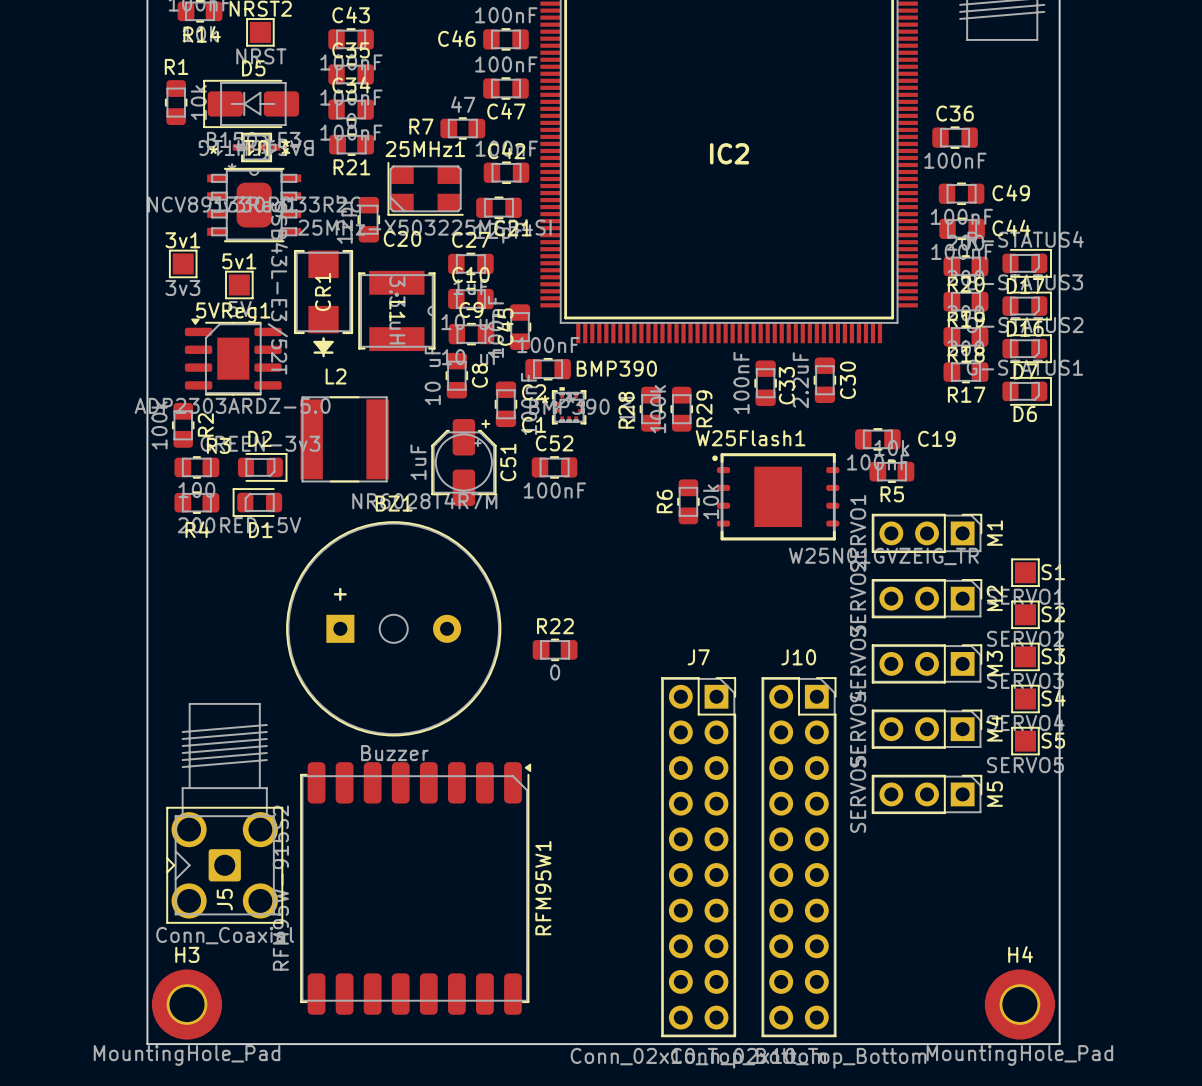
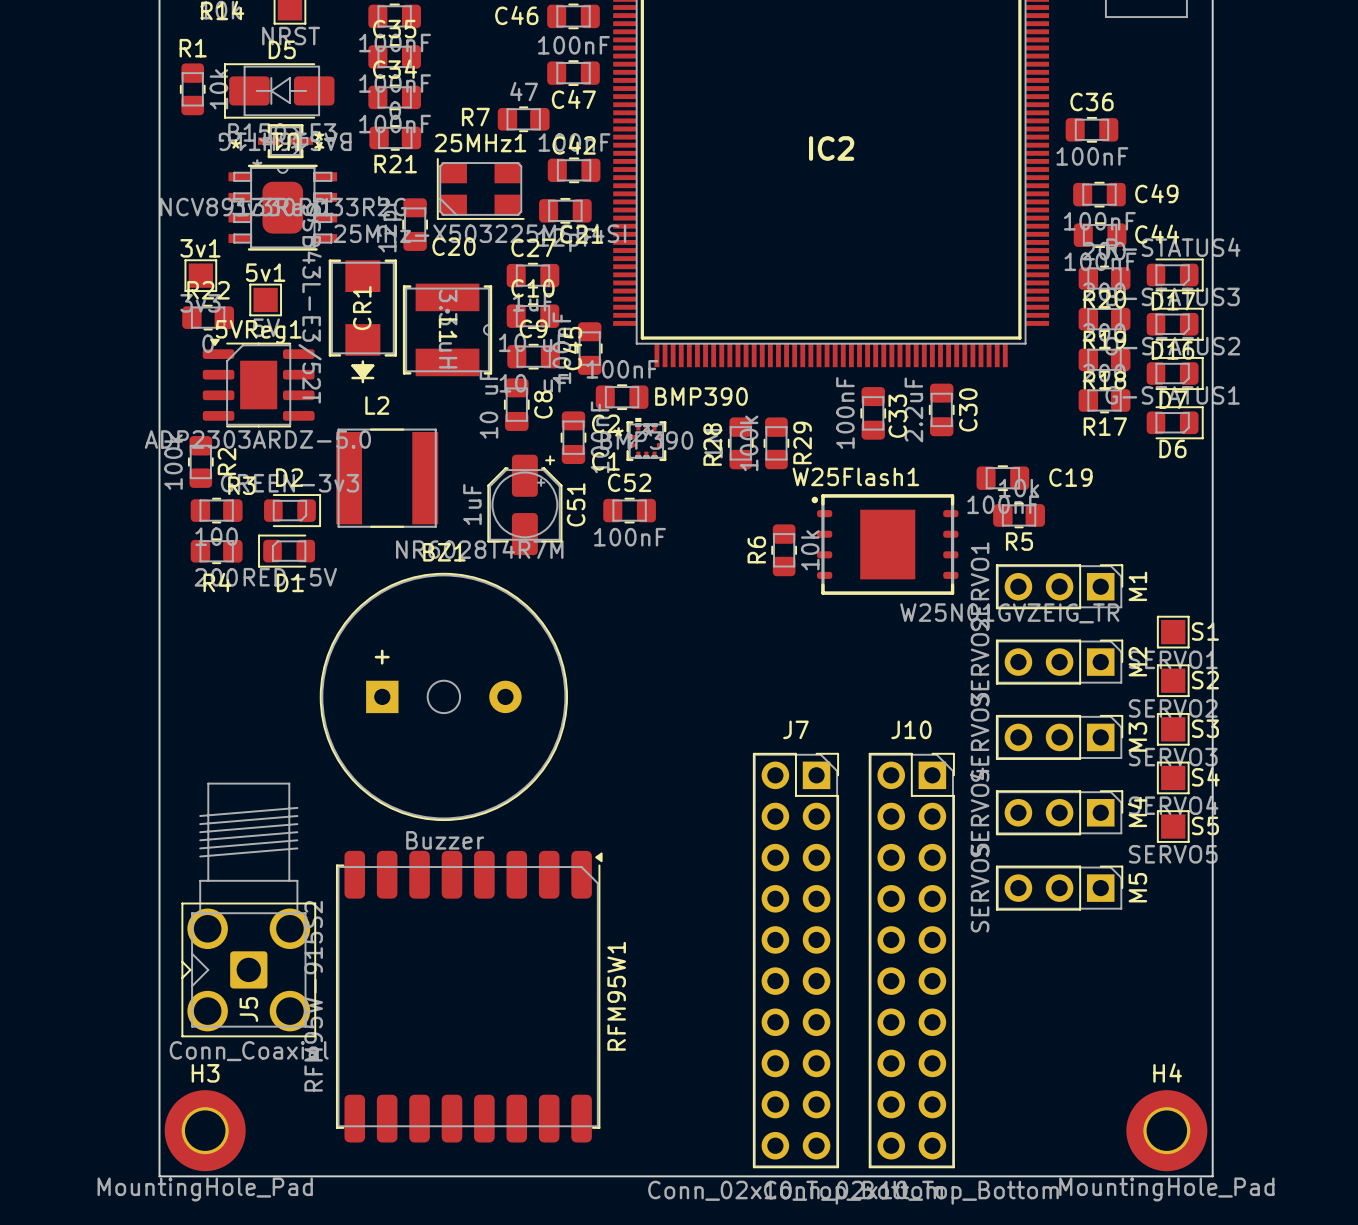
R22 position: (555, 649) -> (208, 317)

